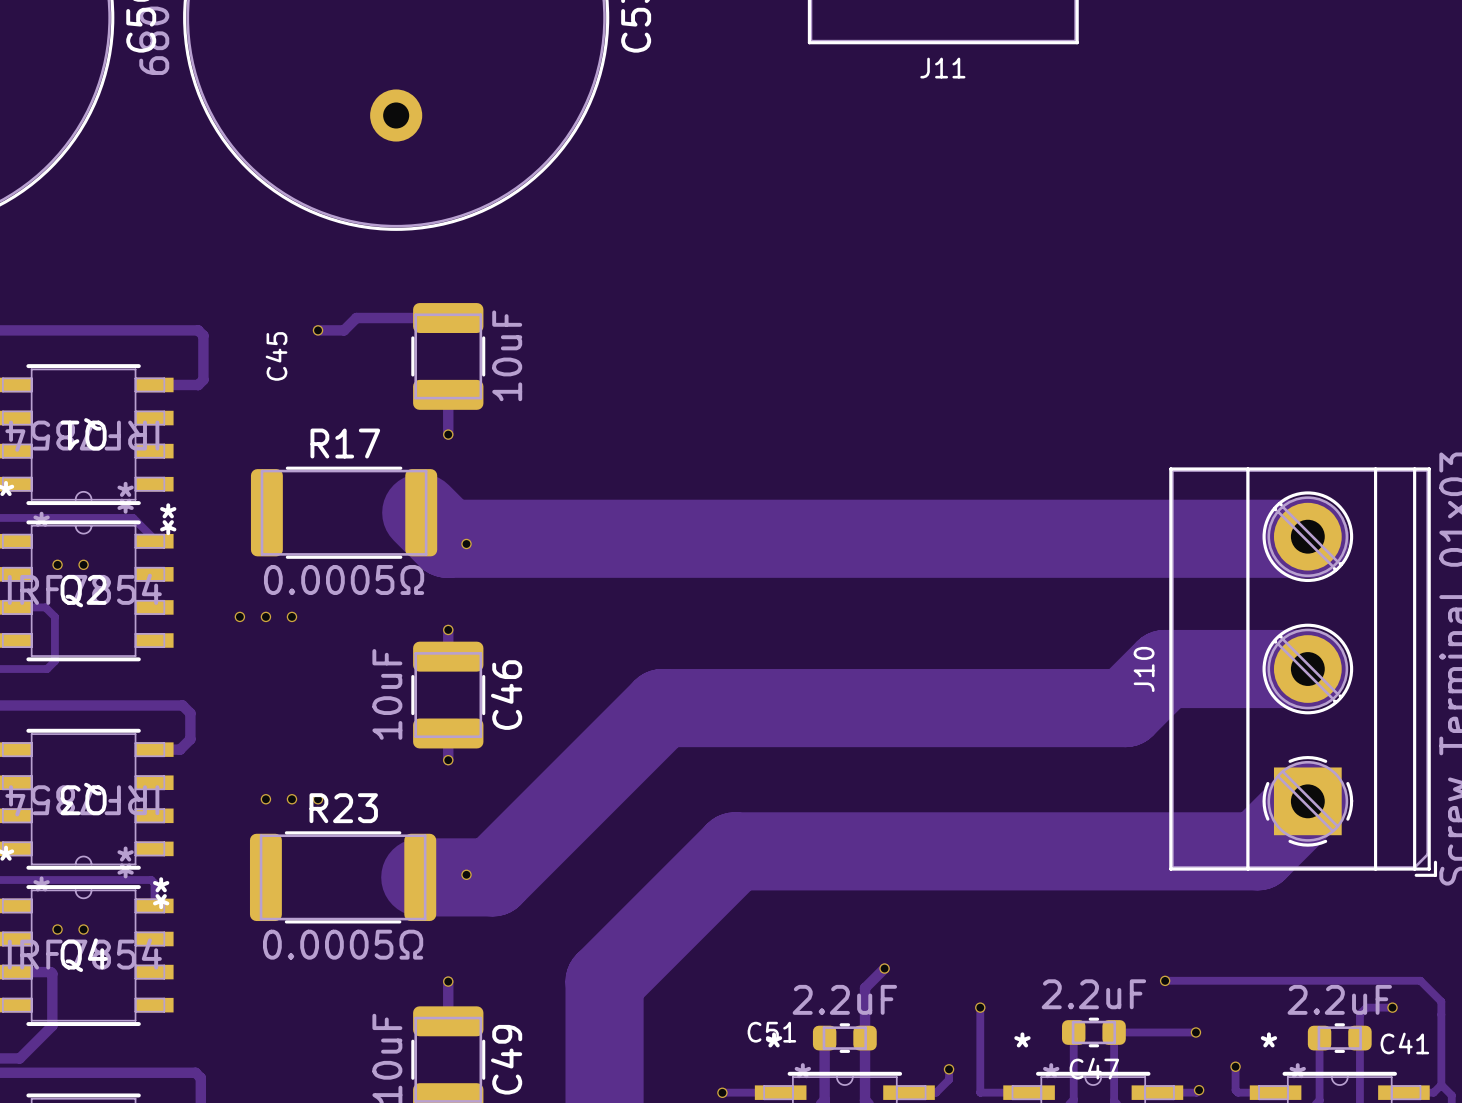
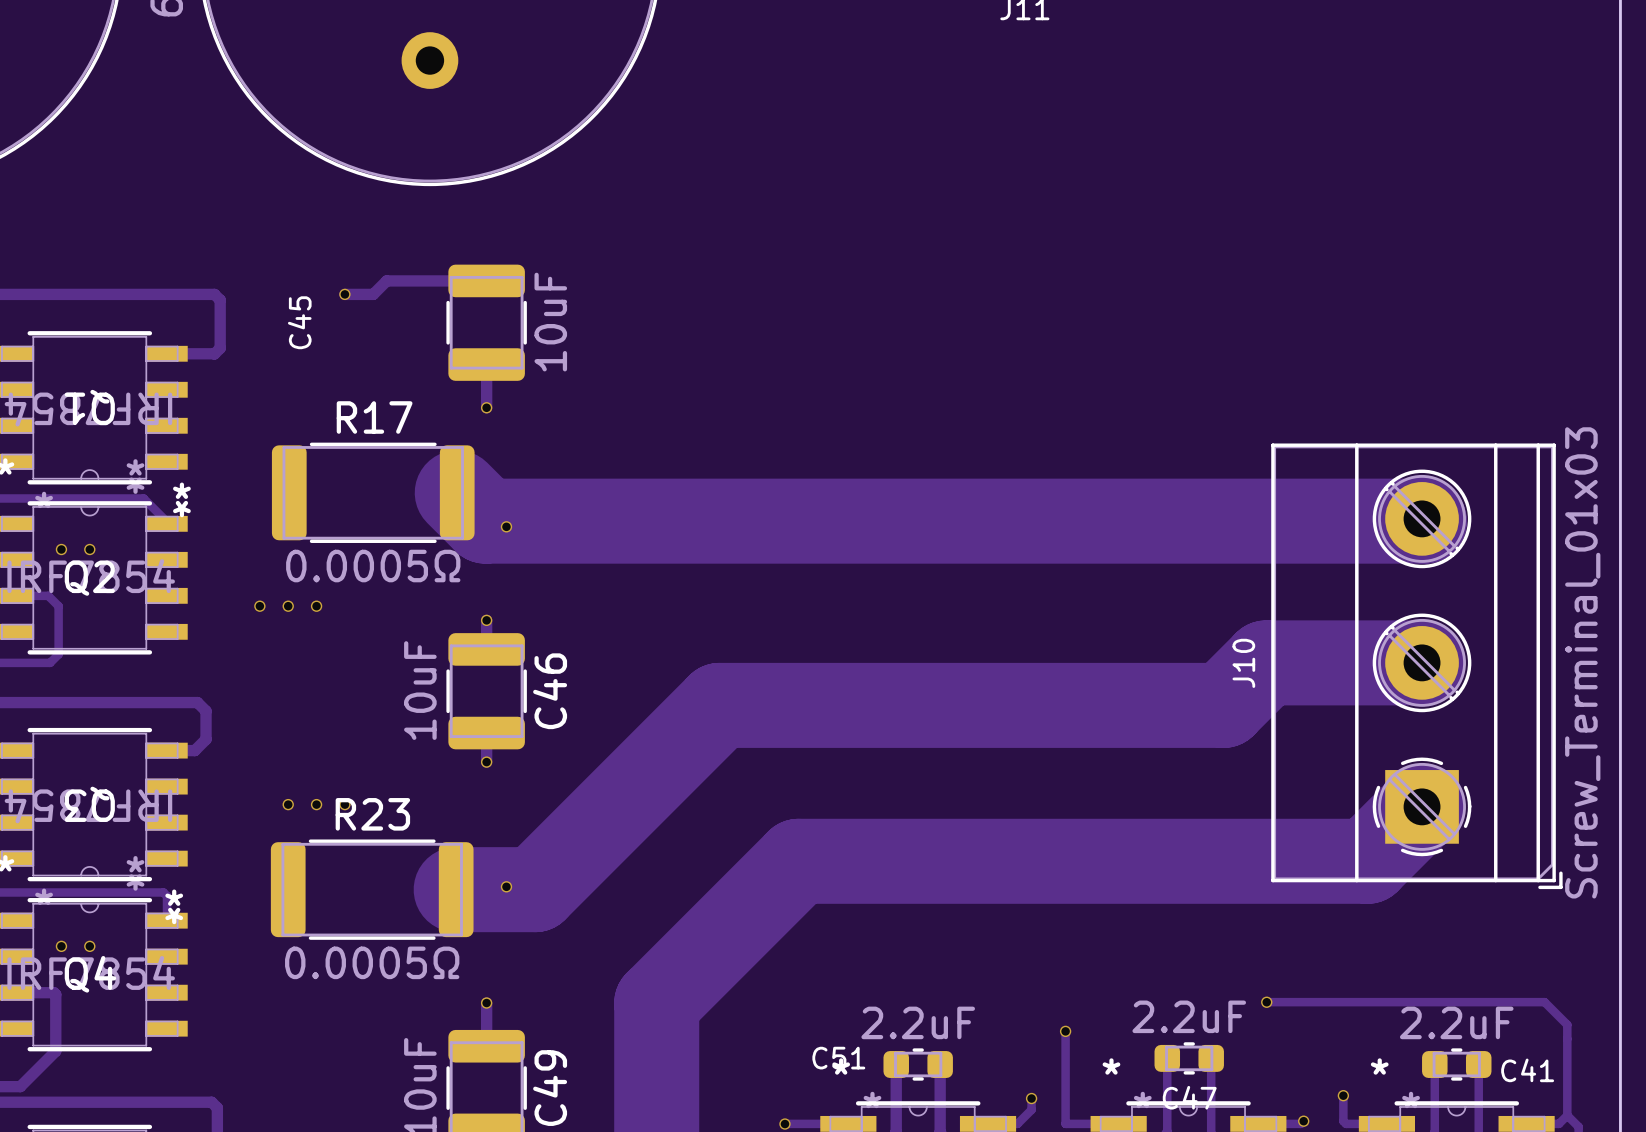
track: (884, 968) (865, 988) (865, 1038) -> none
via: (884, 968) -> none
track: (1392, 1007) (1366, 1007) (1359, 1014) (1359, 1038) -> none
via: (1392, 1007) -> none
track: (1114, 1032) (1195, 1032) -> none
via: (1195, 1032) -> none

